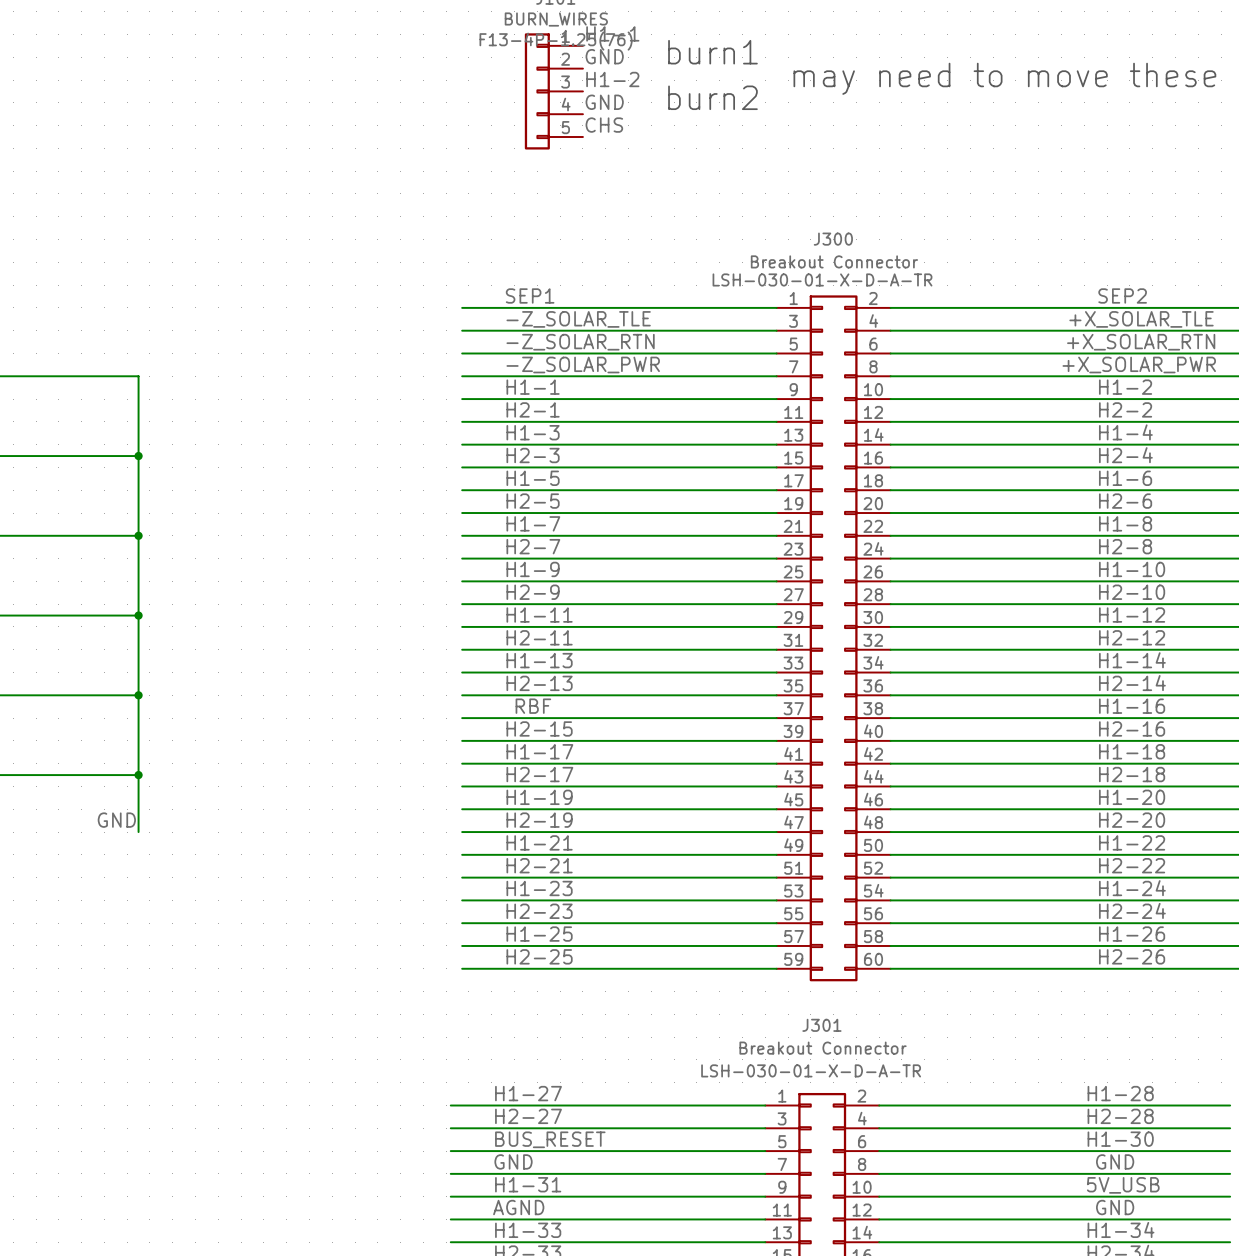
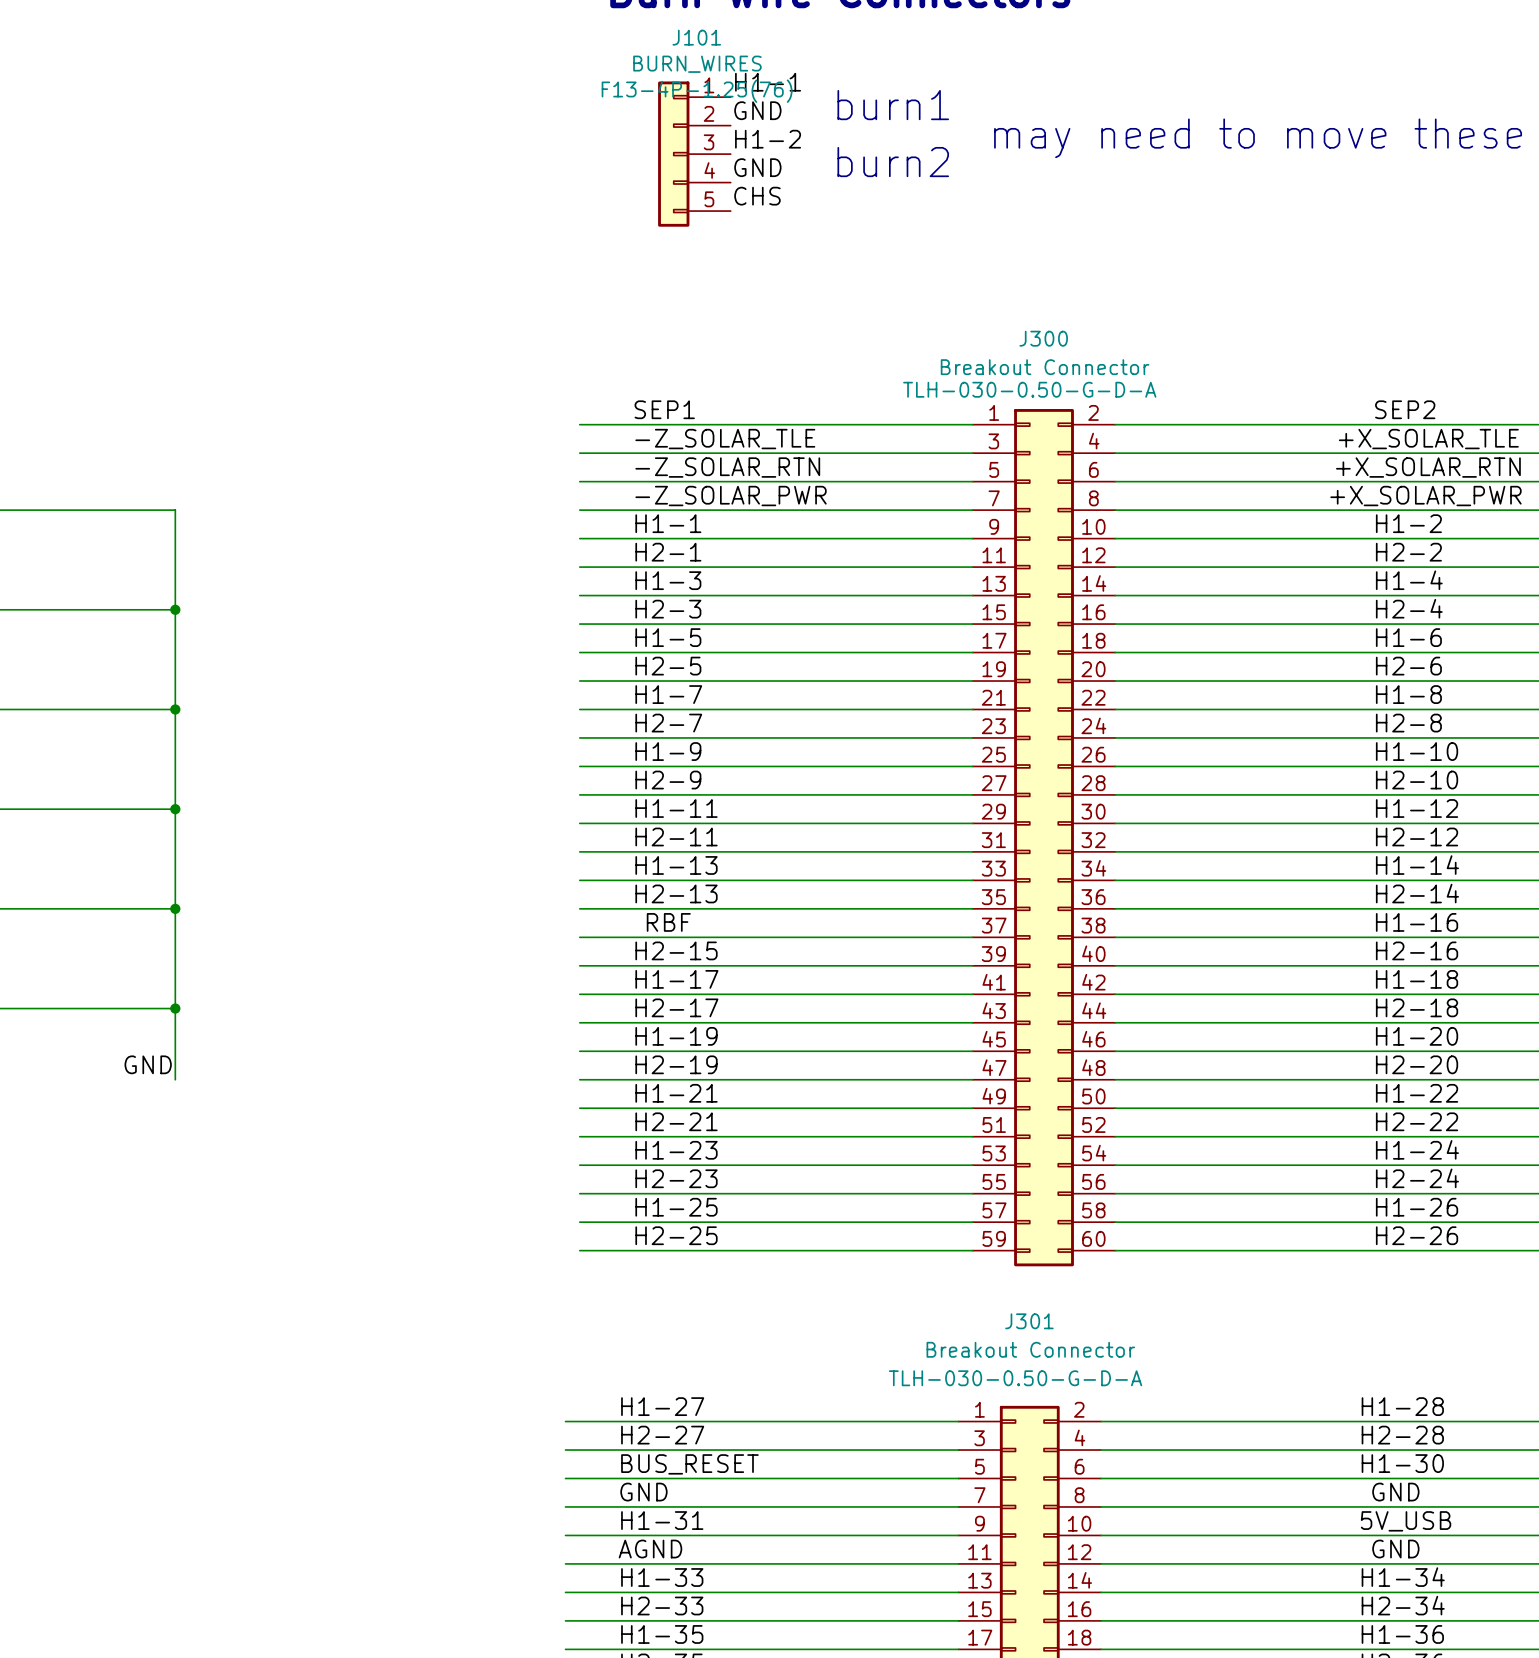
J300 text: LSH-030-01-X-D-A-TR (822, 279) -> TLH-030-0.50-G-D-A (1029, 389)
J301 text: LSH-030-01-X-D-A-TR (811, 1070) -> TLH-030-0.50-G-D-A (1015, 1378)

